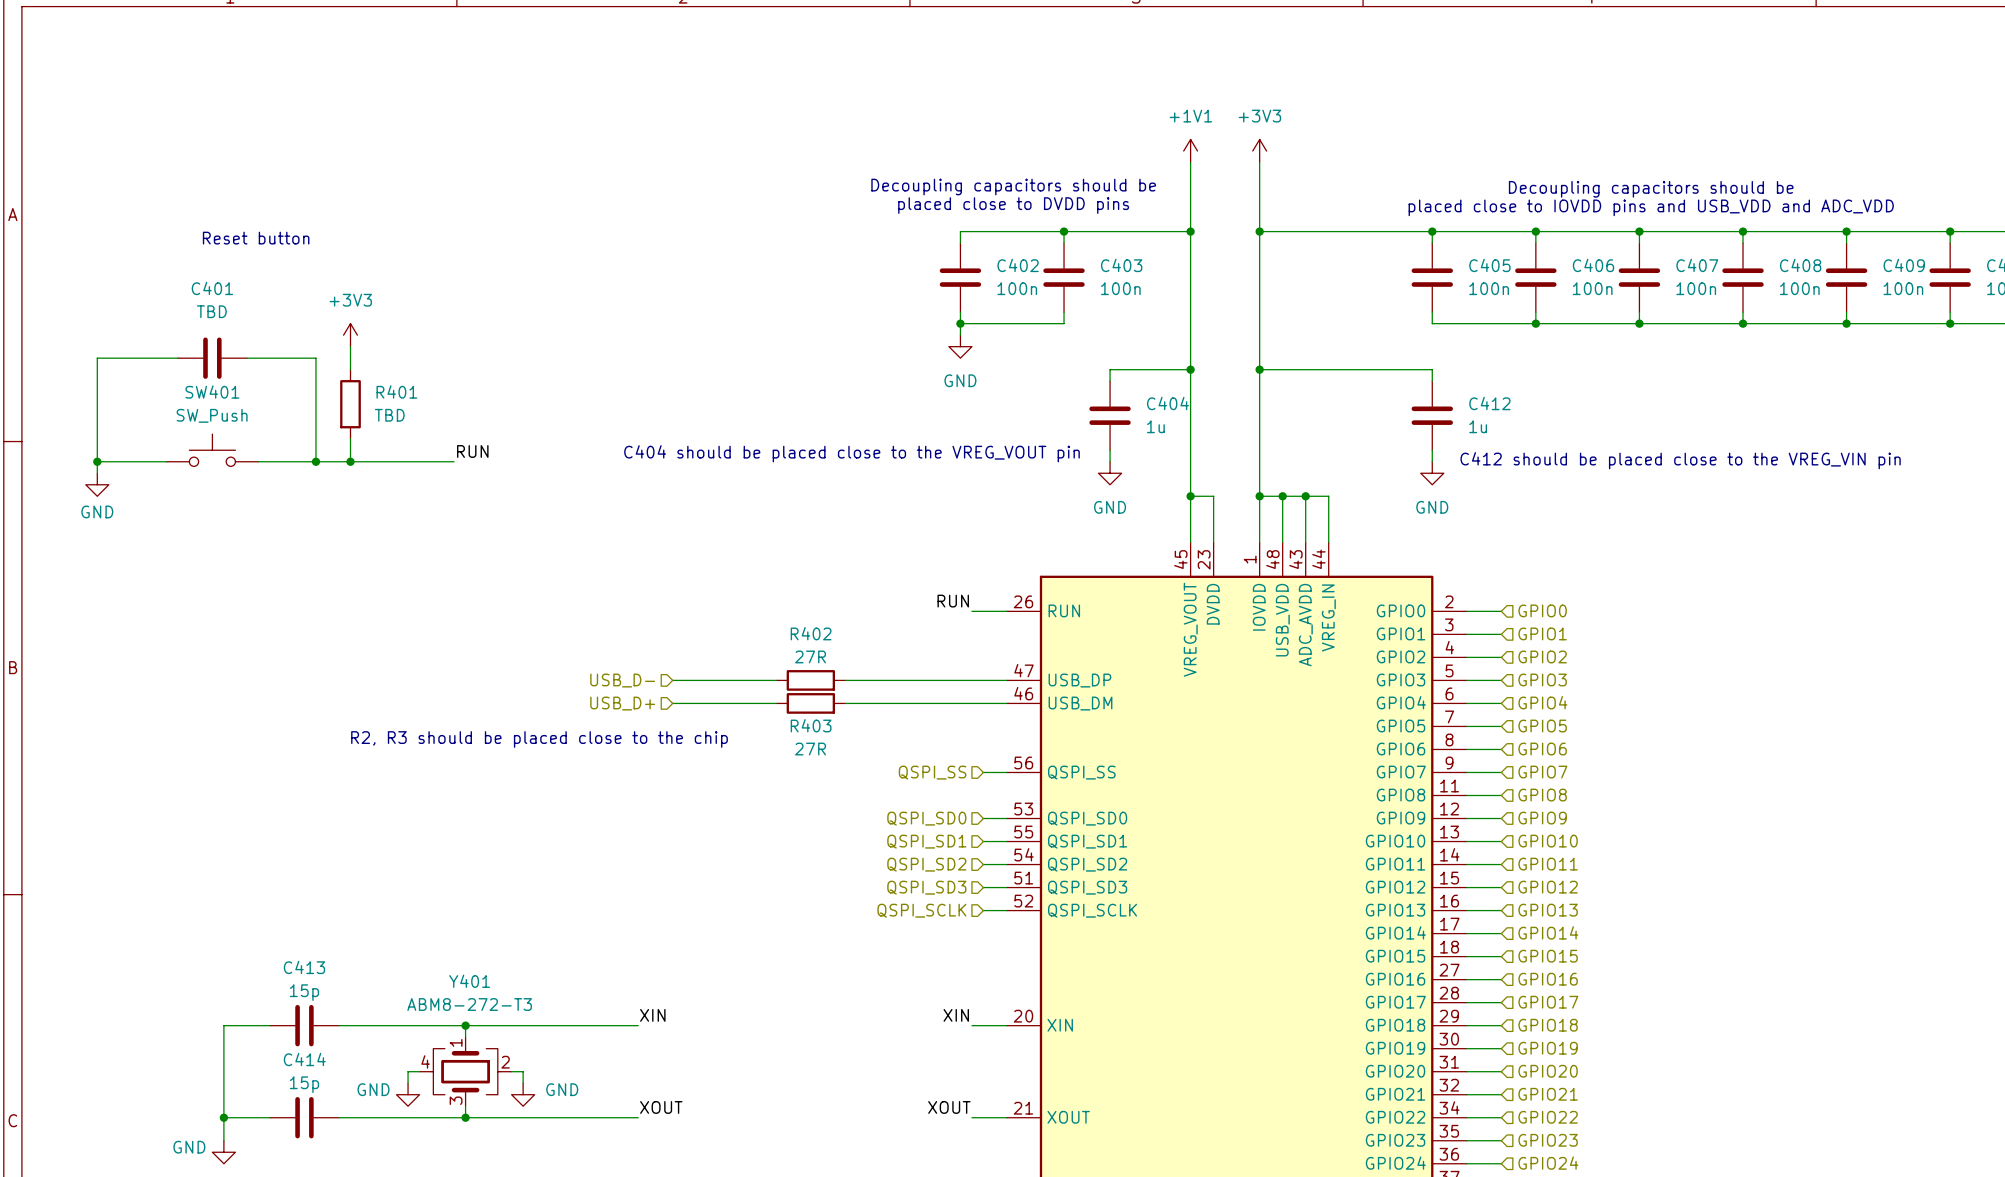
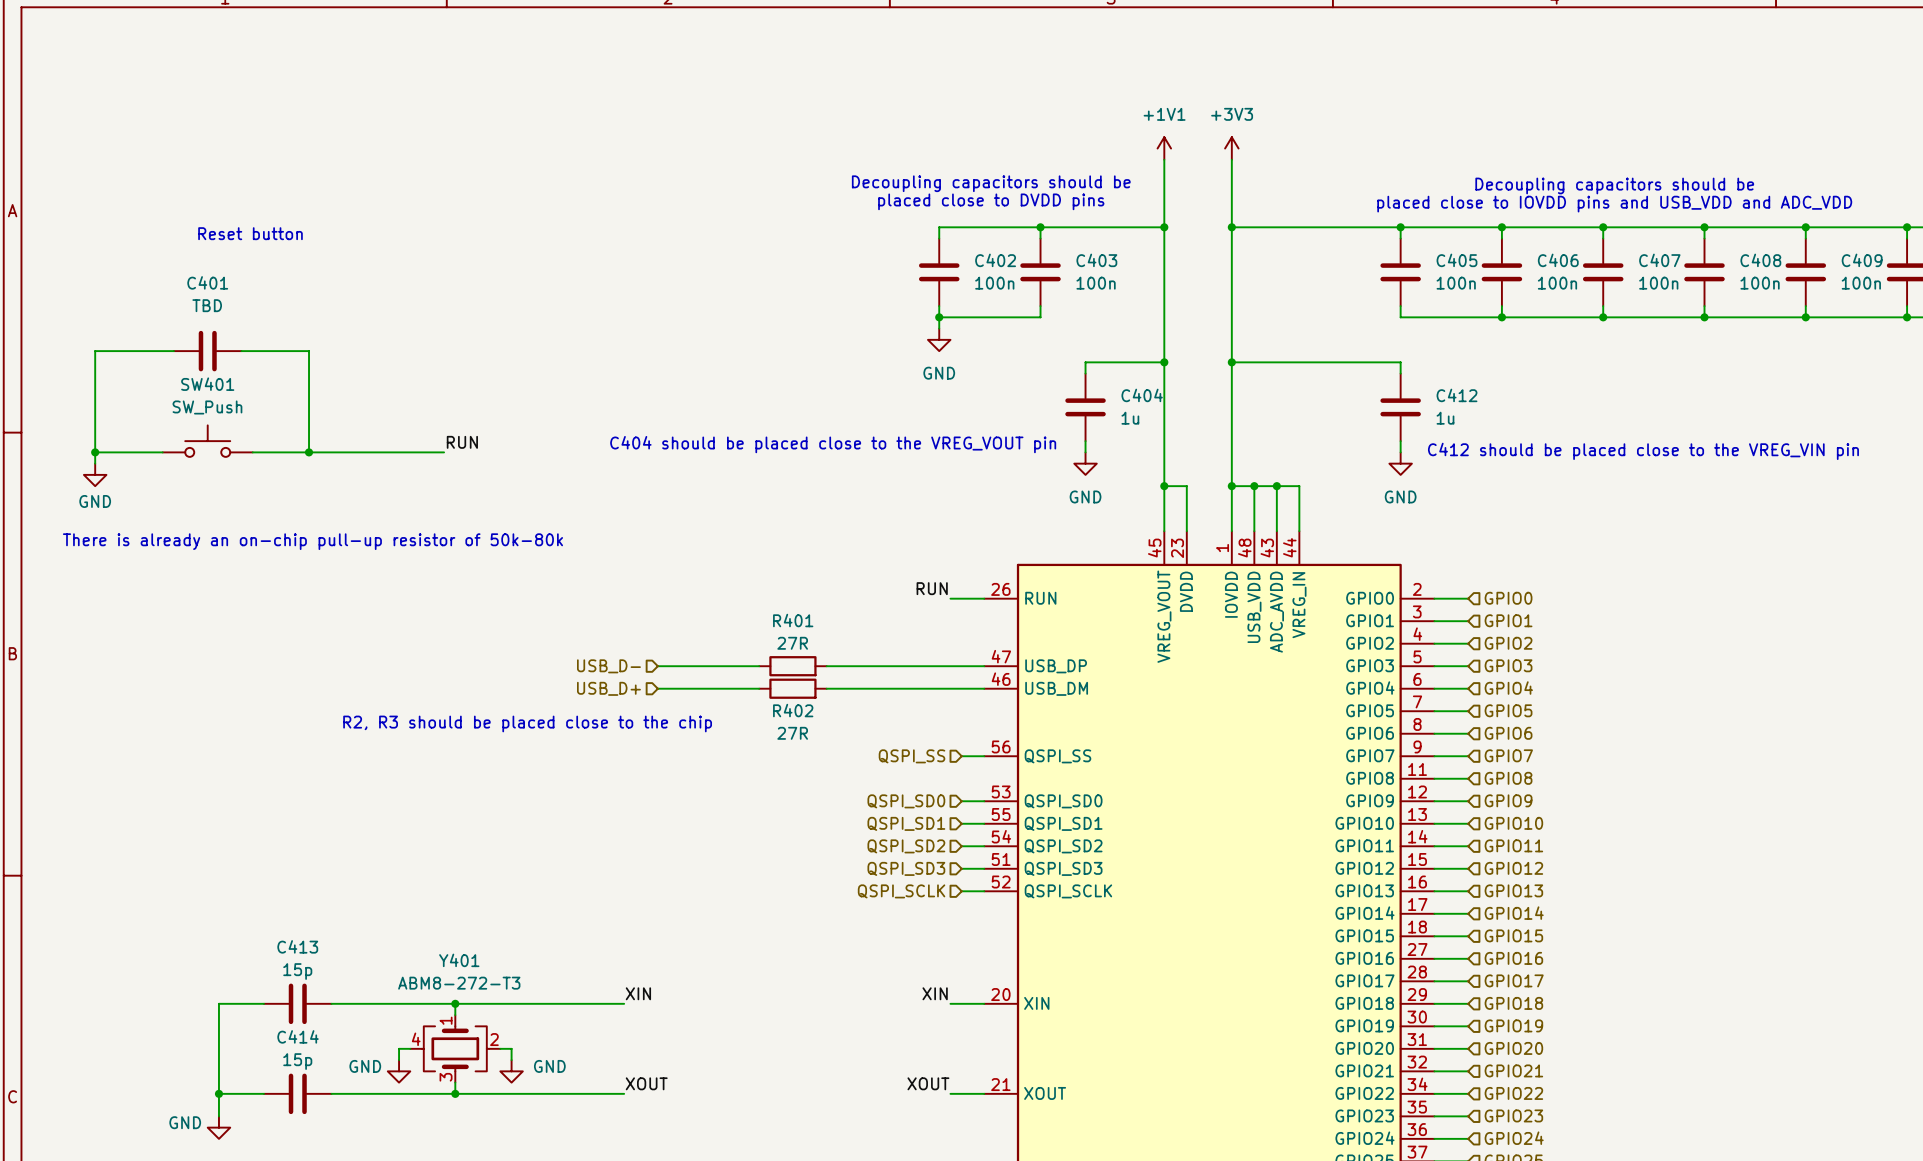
power symbol: +3V3 (350, 335) -> none
wire: (350, 346) (350, 369) -> none
R401: TBD (350, 404) -> none
wire: (350, 438) (350, 461) -> none
junction: (350, 461) -> none
text: none -> There is already an on-chip pull-up resistor of 50k-80k (312, 541)
R402 name: R402 (811, 633) -> R401 (793, 620)
R403 name: R403 (811, 725) -> R402 (793, 710)

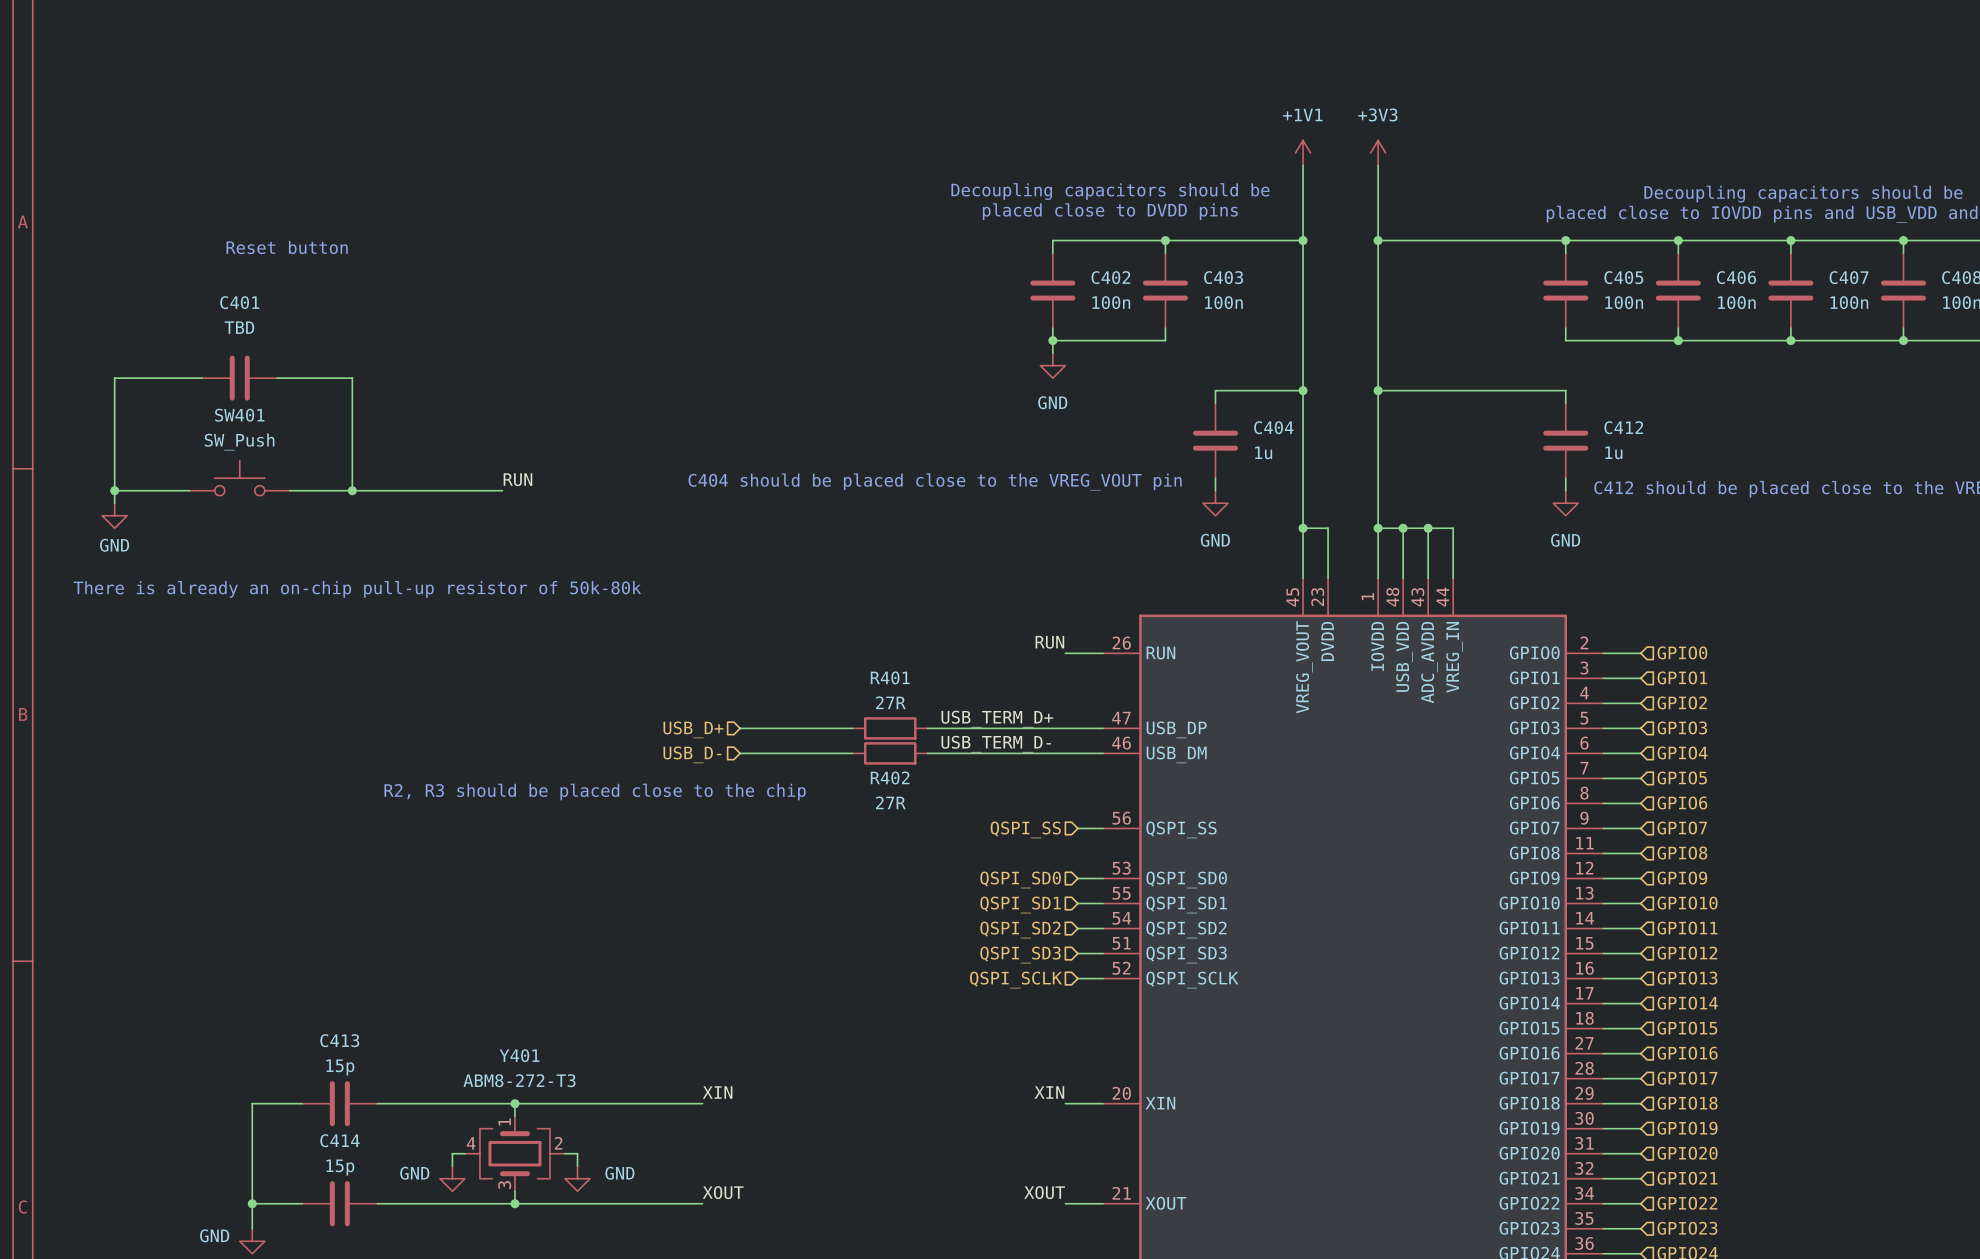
label: none -> USB_TERM_D+ (997, 719)
hierarchical label: USB_D- (608, 666) -> USB_D+ (693, 729)
label: none -> USB_TERM_D- (996, 744)
hierarchical label: USB_D+ (608, 688) -> USB_D- (692, 754)

